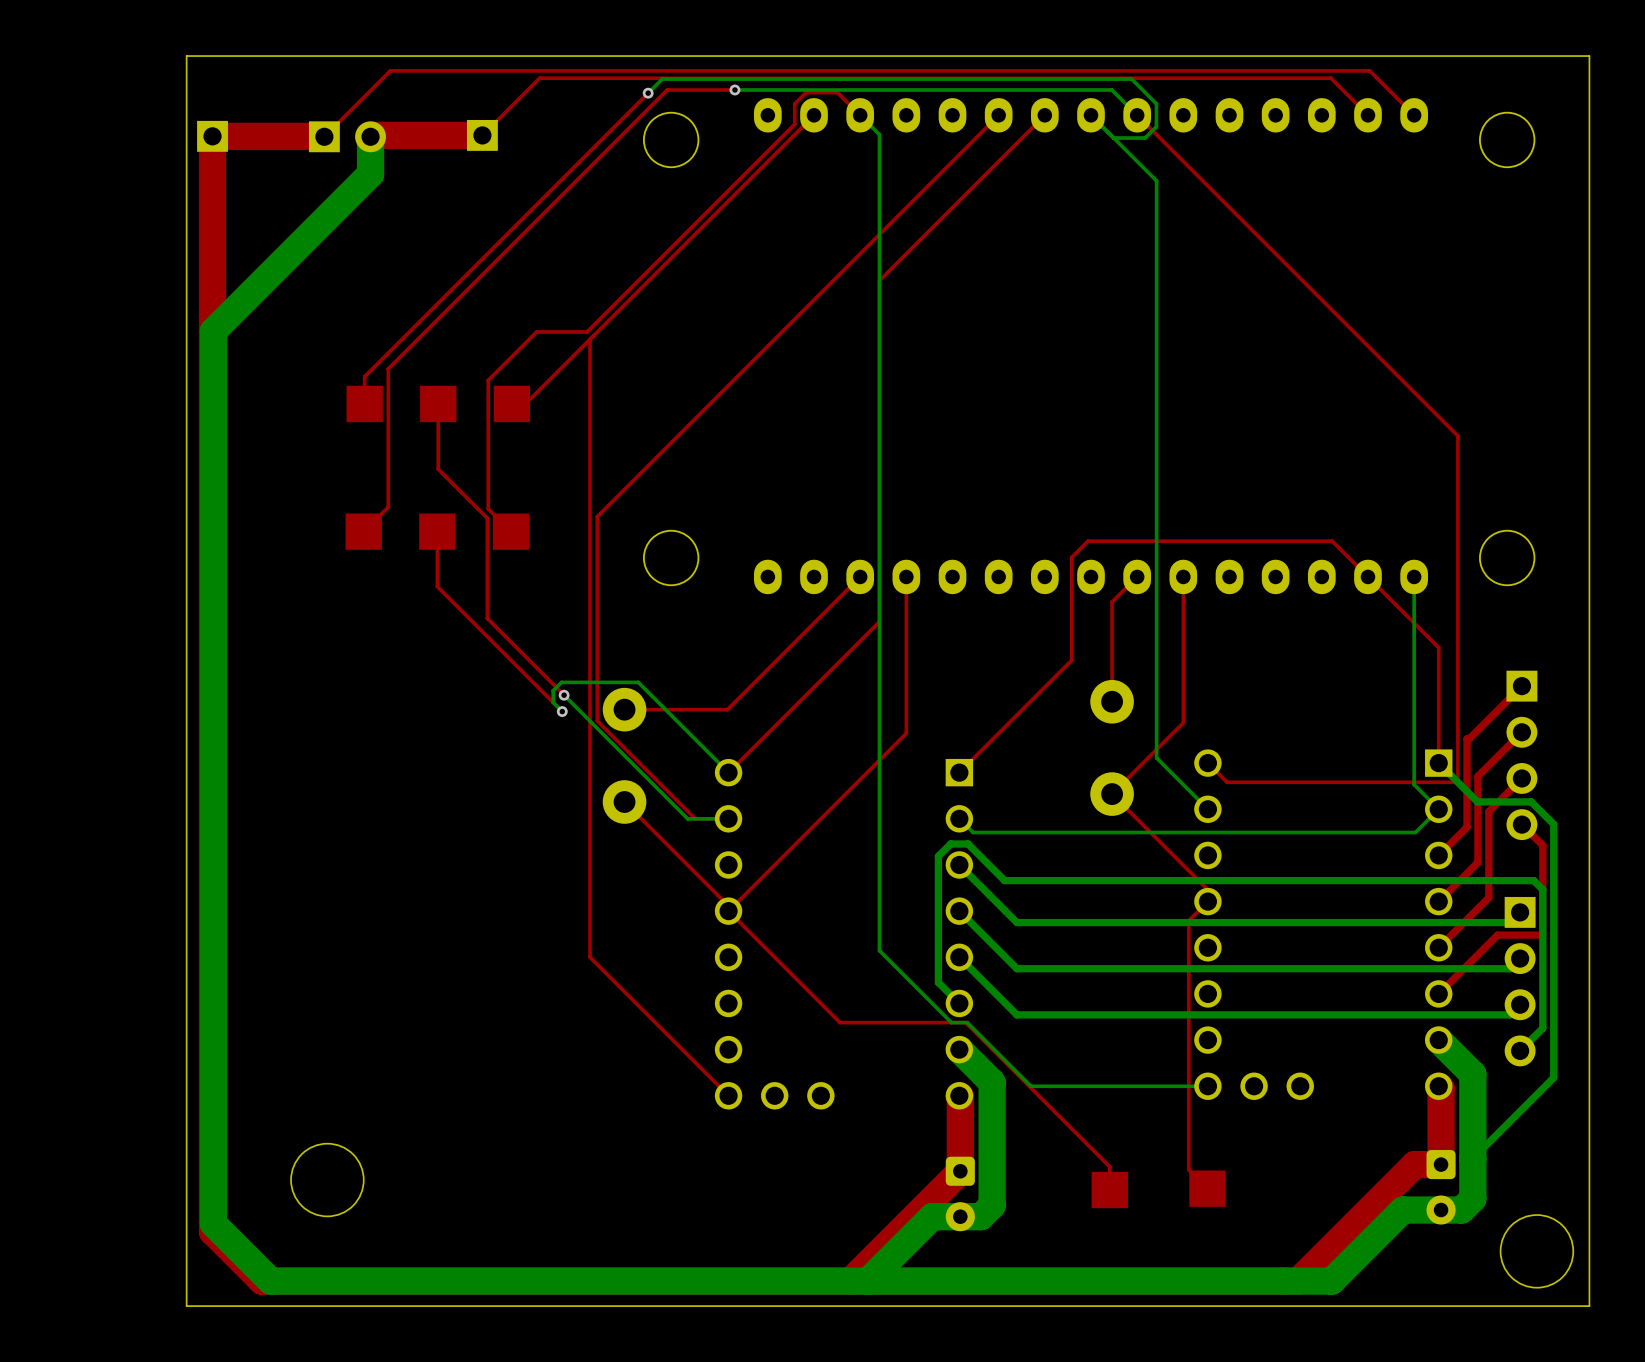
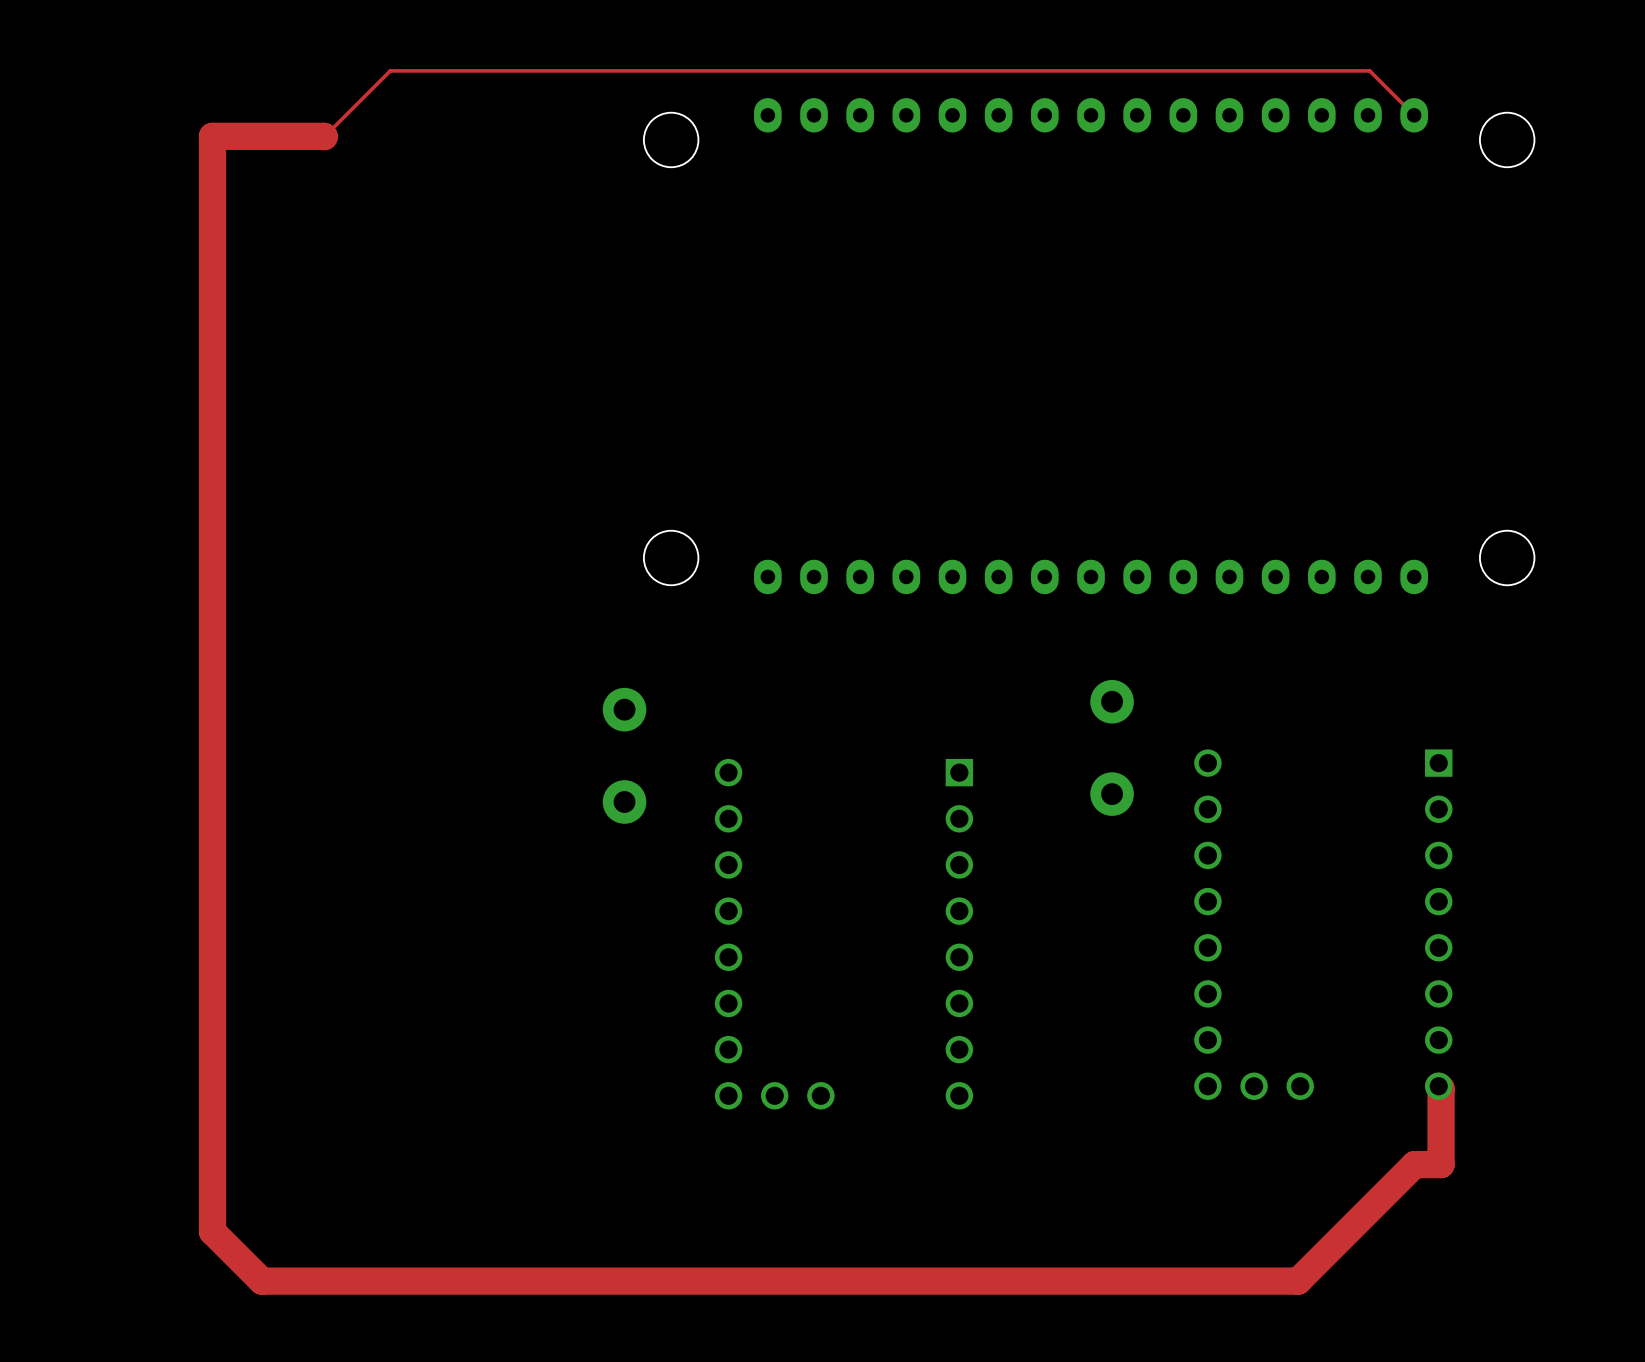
board edge: (1589, 56) (186, 56) (186, 1306) (1589, 1306) (1589, 56) -> none
top track: (734, 89) (667, 89) (388, 368) (388, 507) (363, 531) -> none
bottom track: (734, 89) (1111, 89) (1137, 115) -> none
via: (734, 89) -> none
top track: (648, 93) (364, 376) (364, 403) -> none
bottom track: (648, 93) (662, 79) (1131, 79) (1156, 103) (1156, 126) (1145, 138) (1113, 138) -> none
via: (648, 93) -> none
top track: (814, 115) (525, 403) (511, 403) -> none
top track: (860, 115) (837, 92) (806, 92) (794, 103) (794, 124) (587, 331) (536, 331) (488, 380) (488, 508) (510, 531) -> none
bottom track: (860, 115) (879, 134) (879, 950) (951, 1022) (967, 1022) (1030, 1086) (1207, 1086) -> none
top track: (998, 115) (597, 516) (597, 720) (695, 818) (728, 818) -> none
top track: (1044, 115) (879, 280) (879, 621) (728, 772) -> none
bottom track: (1091, 115) (1156, 180) (1156, 757) (1207, 809) -> none
top track: (1137, 115) (1457, 436) (1457, 782) (1227, 782) (1207, 763) -> none
top track: (1367, 115) (1330, 78) (539, 78) (482, 135) (370, 136) -> none
part: (482, 135) -> none
part: (212, 136) -> none
part: (347, 136) -> none
bottom track: (370, 136) (370, 174) (213, 331) (213, 1223) (270, 1281) (1331, 1281) (1402, 1210) (1461, 1210) (1472, 1198) (1472, 1074) (1438, 1040) -> none
top track: (590, 339) (590, 957) (728, 1095) -> none
part: (364, 403) -> none
top track: (438, 403) (438, 469) (487, 518) (487, 618) (564, 695) -> none
part: (438, 403) -> none
part: (511, 403) -> none
part: (363, 531) -> none
top track: (437, 531) (437, 586) (562, 711) -> none
part: (437, 531) -> none
part: (510, 531) -> none
top track: (860, 576) (727, 709) (624, 709) -> none
top track: (906, 576) (906, 733) (728, 911) -> none
top track: (1137, 576) (1112, 602) (1112, 701) -> none
top track: (1183, 576) (1183, 722) (1112, 794) (1207, 889) (1207, 901) (1188, 920) (1188, 1169) (1207, 1188) -> none
bottom track: (1414, 576) (1414, 784) (1438, 809) (1415, 832) (973, 832) (959, 818) -> none
top track: (1521, 686) (1469, 738) (1466, 738) (1466, 827) (1438, 855) -> none
bottom track: (564, 695) (687, 818) (728, 818) -> none
via: (564, 695) -> none
bottom track: (562, 711) (553, 702) (553, 690) (561, 682) (638, 682) (728, 772) -> none
via: (562, 711) -> none
top track: (1521, 732) (1477, 776) (1477, 862) (1438, 901) -> none
part: (1521, 755) -> none
top track: (1438, 763) (1438, 647) (1332, 541) (1088, 541) (1071, 557) (1071, 660) (959, 772) -> none
bottom track: (1438, 763) (1477, 801) (1531, 801) (1553, 824) (1553, 1077) (1472, 1158) -> none
top track: (1521, 778) (1488, 811) (1488, 897) (1438, 947) -> none
top track: (624, 801) (728, 906) (728, 911) -> none
top track: (1521, 824) (1542, 845) (1542, 935) (1497, 935) (1438, 993) -> none
bottom track: (959, 864) (1016, 922) (1509, 922) (1520, 912) -> none
top track: (728, 911) (840, 1022) (965, 1022) (1109, 1166) (1109, 1190) -> none
bottom track: (959, 911) (1016, 968) (1509, 968) (1520, 958) -> none
bottom track: (959, 957) (1016, 1014) (1509, 1014) (1520, 1004) -> none
part: (1520, 981) -> none
bottom track: (959, 1003) (938, 982) (938, 856) (950, 843) (968, 843) (1004, 880) (1533, 880) (1542, 889) (1542, 1028) (1520, 1050) -> none
bottom track: (959, 1049) (992, 1082) (992, 1205) (980, 1216) (932, 1216) (867, 1281) -> none
top track: (959, 1095) (960, 1171) (852, 1278) (852, 1281) -> none
round board edge: [290, 1143, 365, 1217] -> none
part: (1441, 1187) -> none
part: (1207, 1188) -> none
part: (1109, 1190) -> none
part: (960, 1193) -> none
round board edge: [1500, 1214, 1574, 1289] -> none

